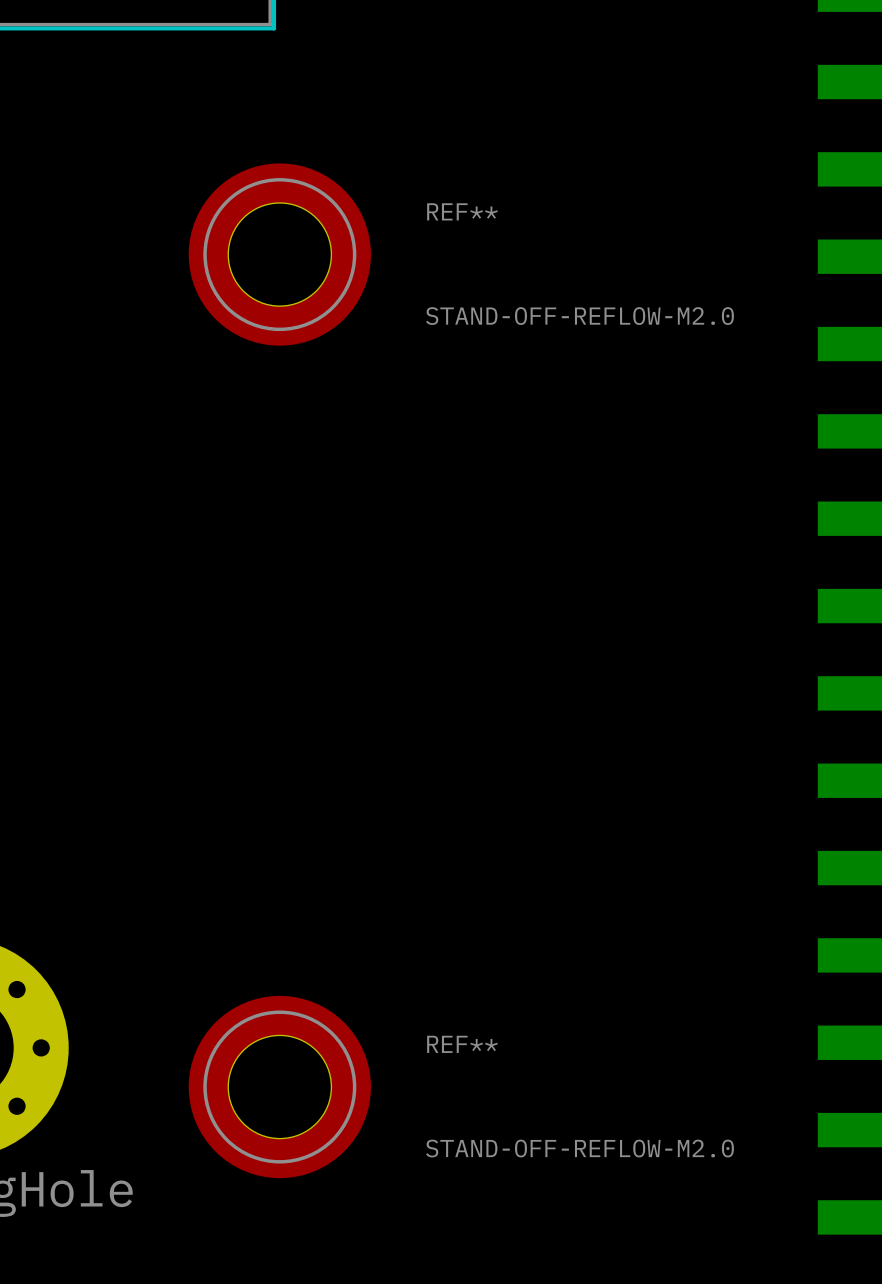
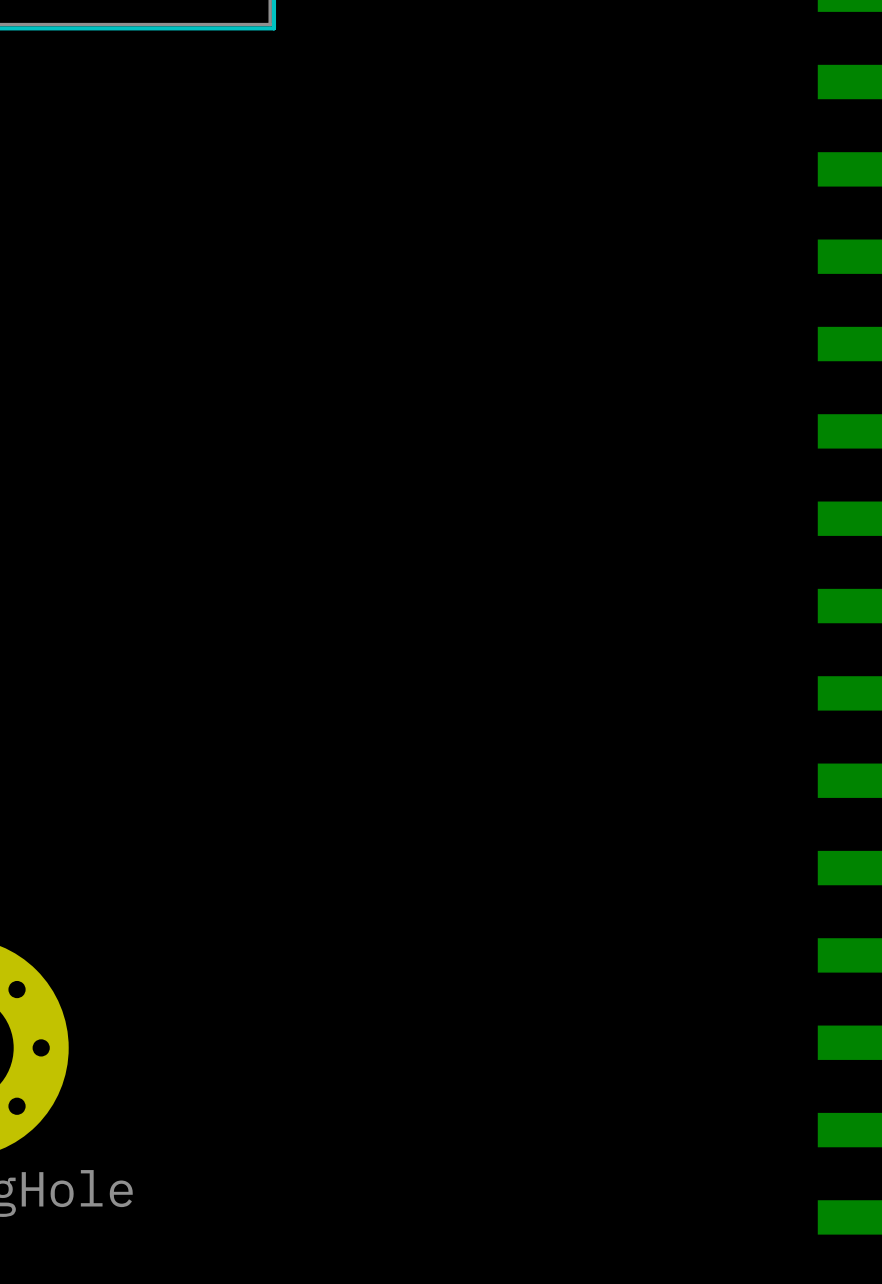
REF**: STAND-OFF-REFLOW-M2.0 (279, 254) -> none
REF**: STAND-OFF-REFLOW-M2.0 (279, 1087) -> none

